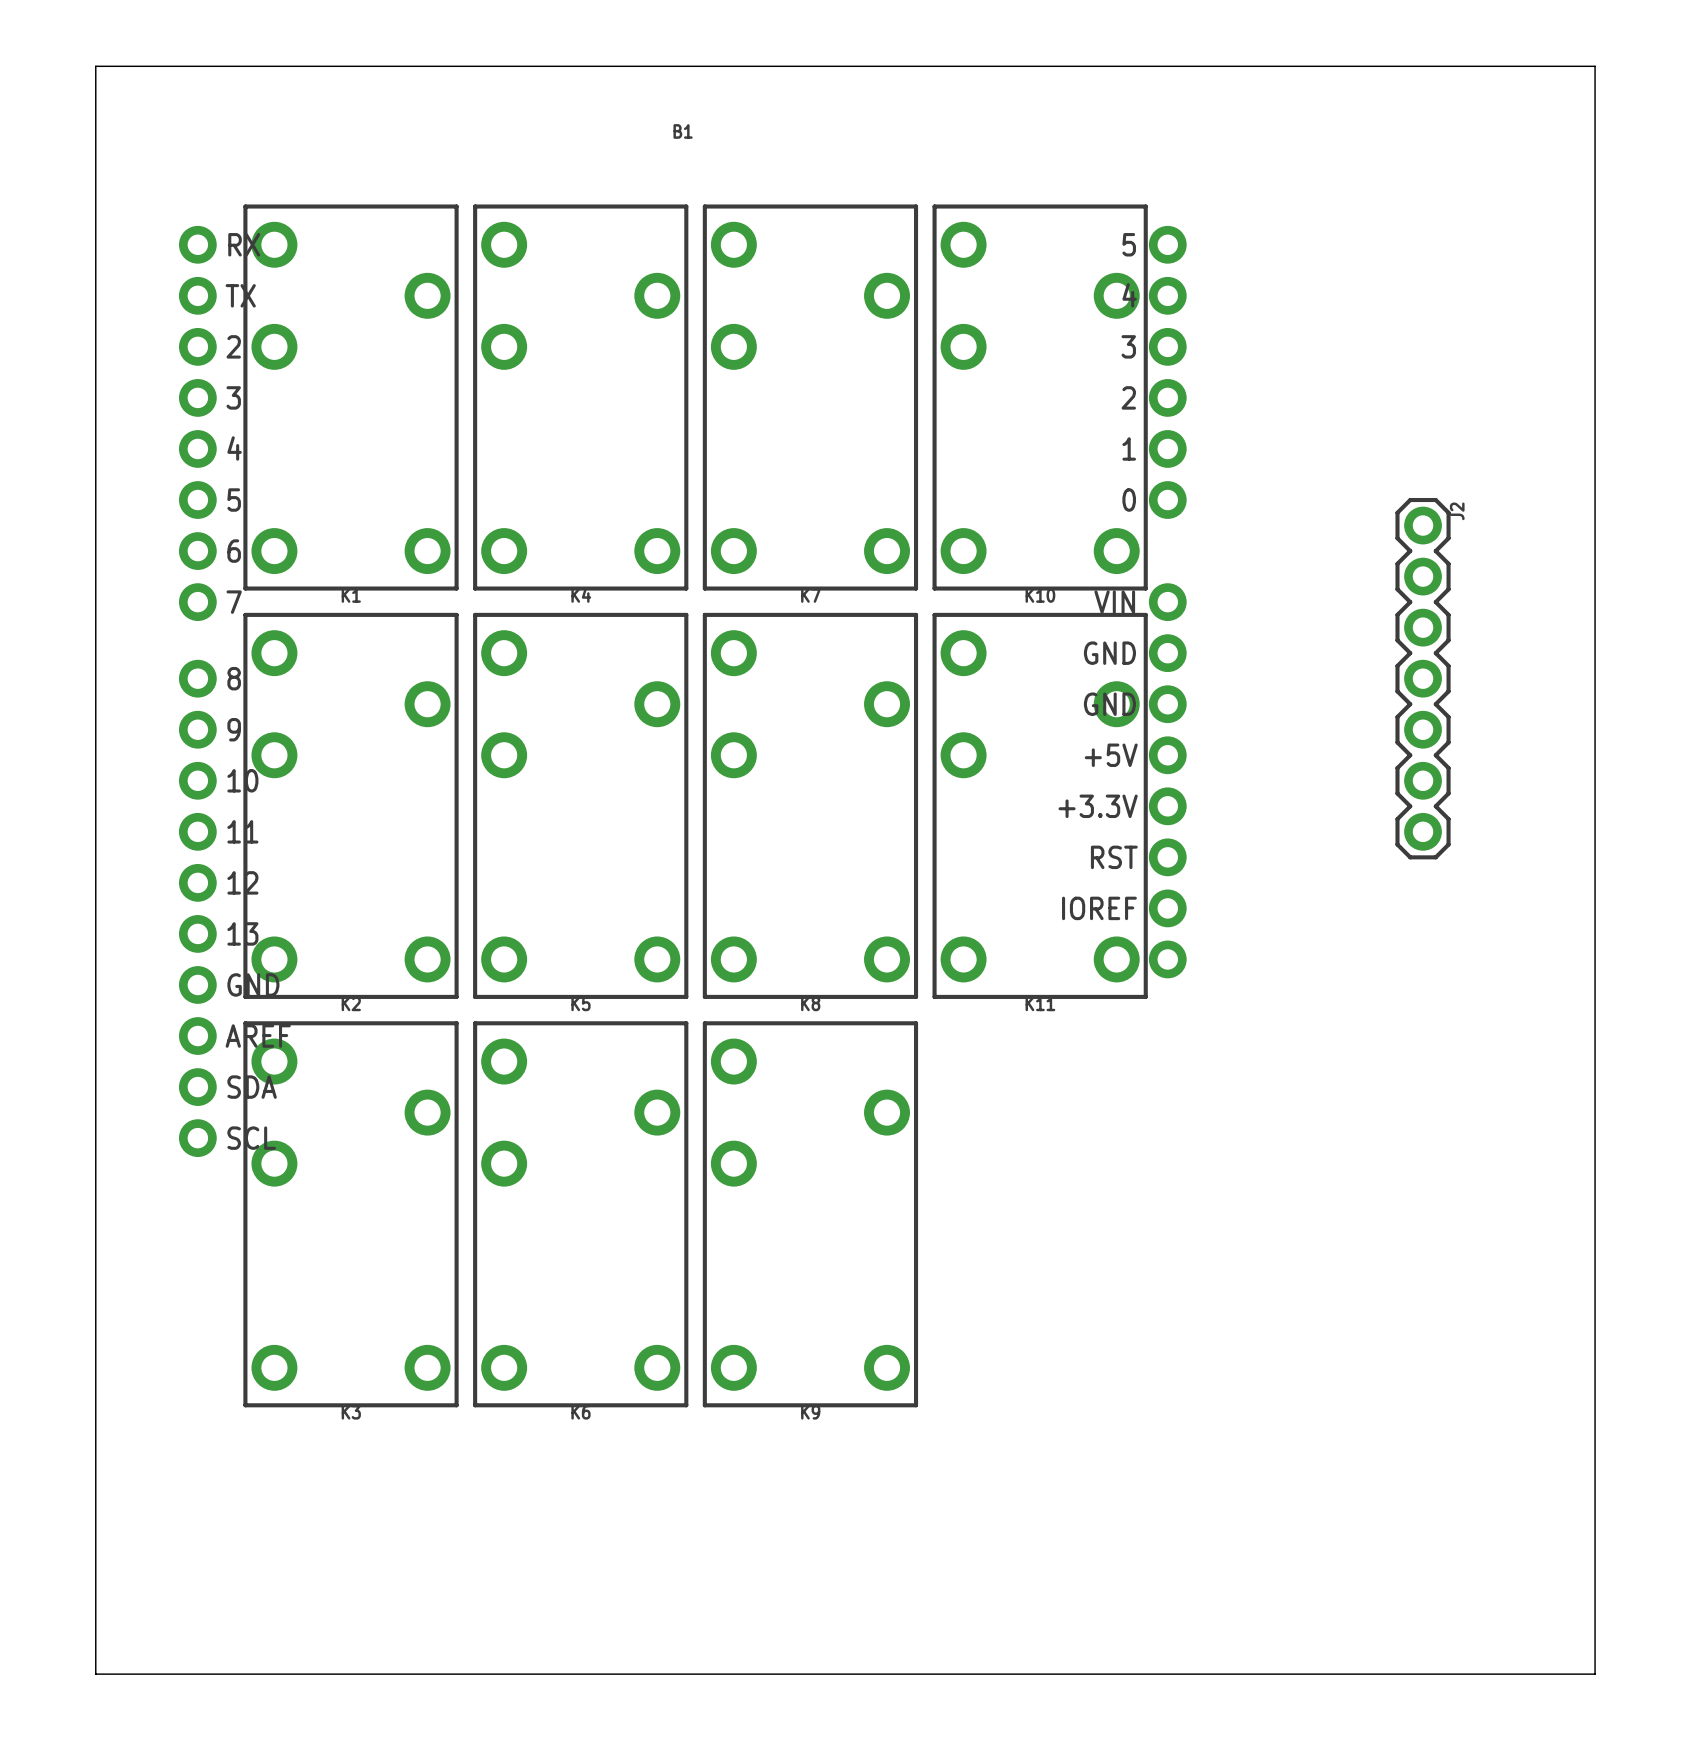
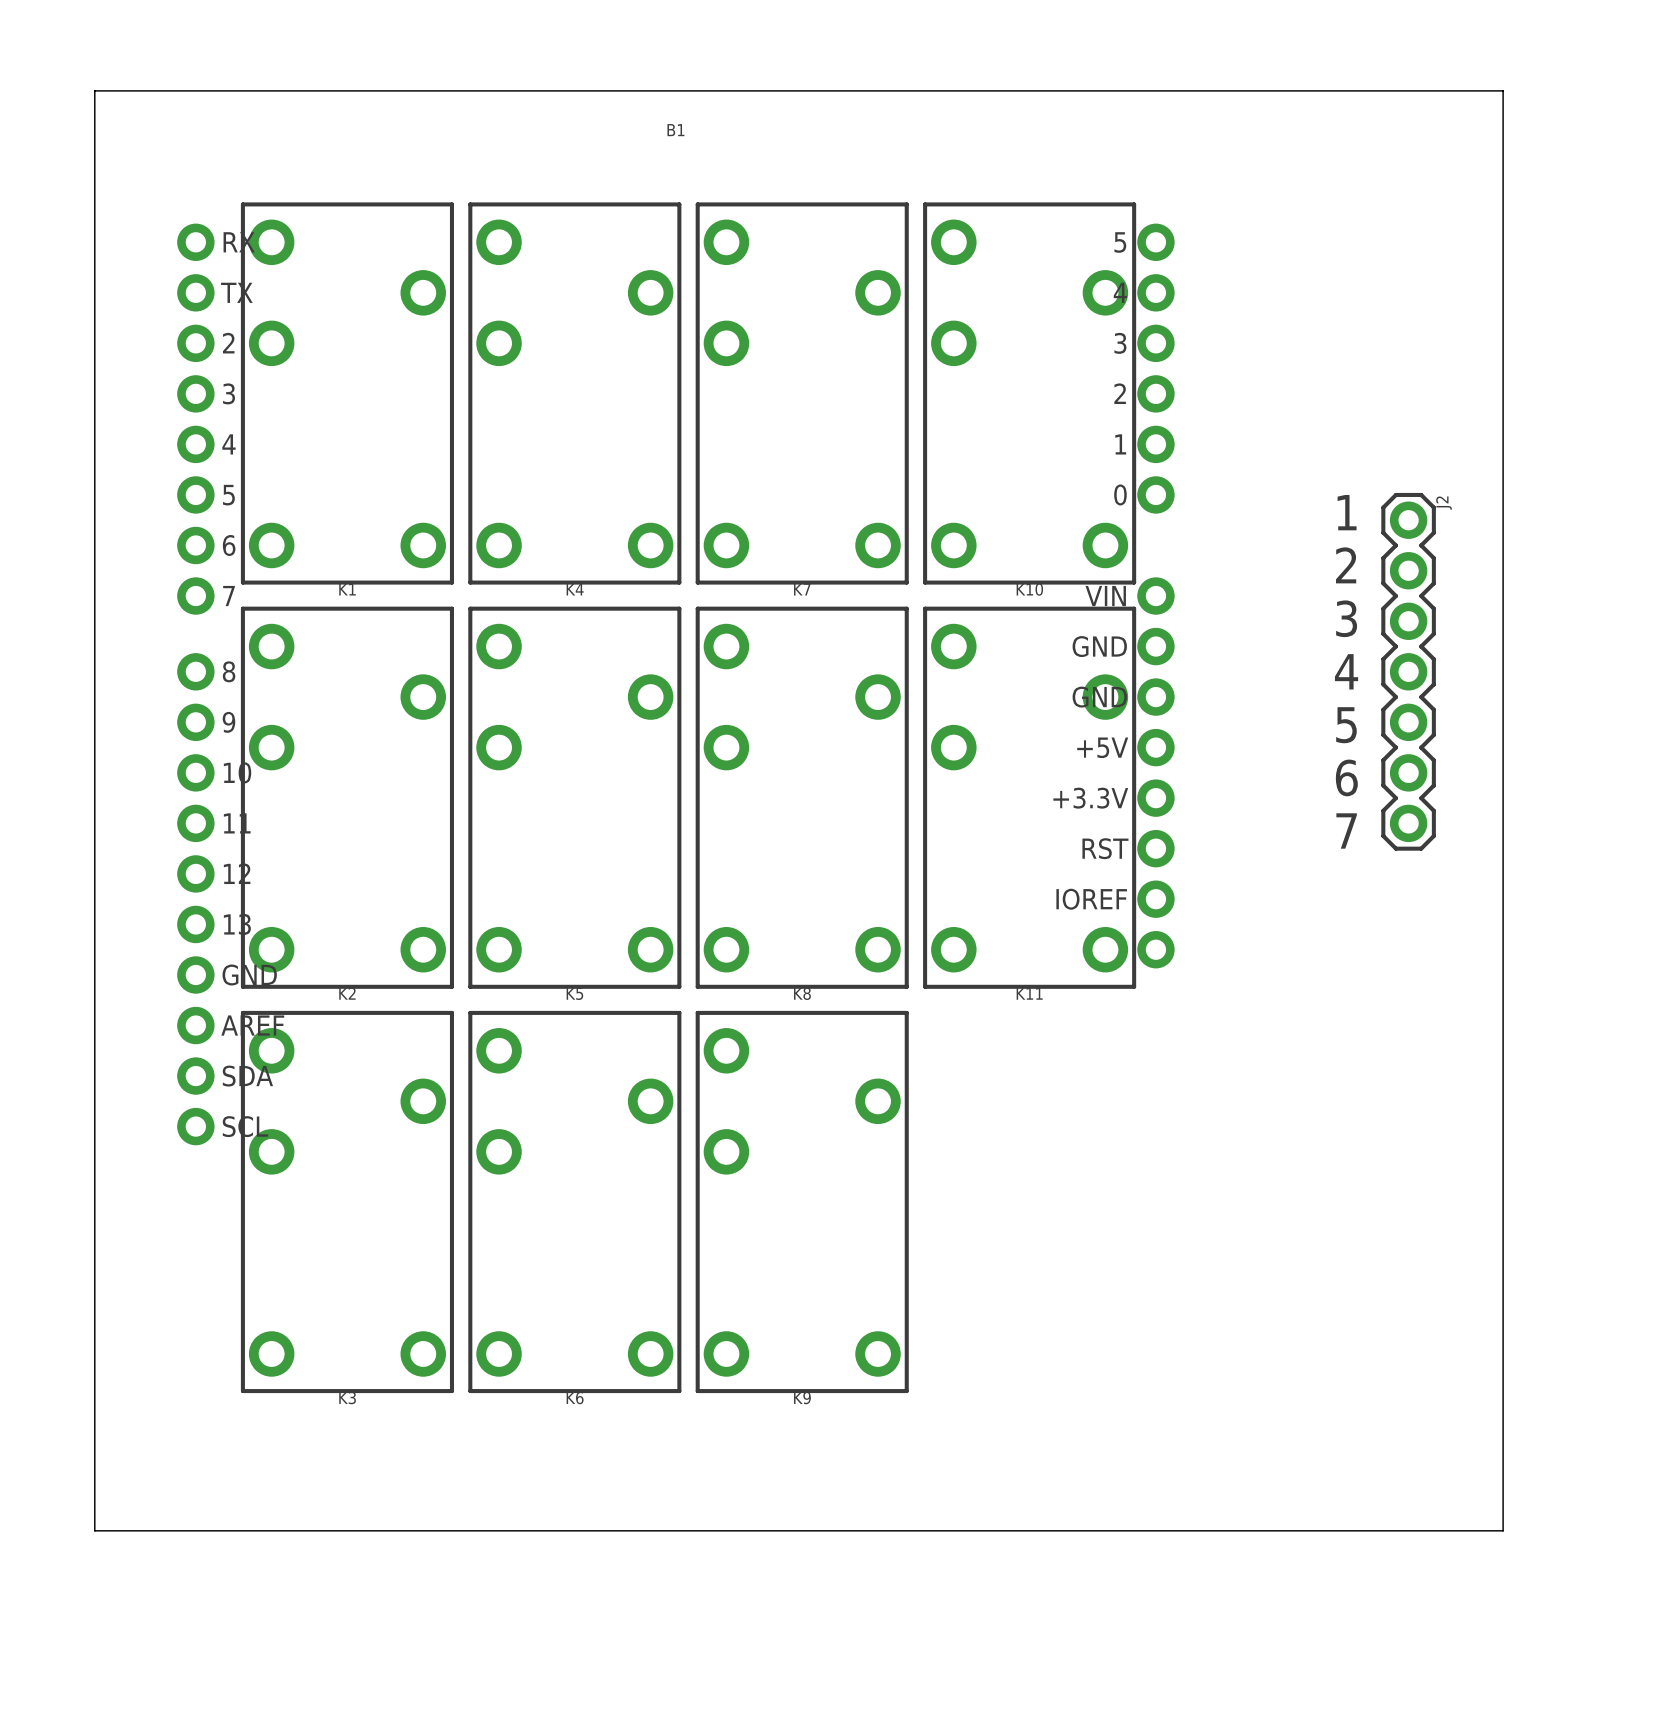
board edge: (95, 91) (95, 66) (1595, 66) (1595, 1674) (95, 1674) (95, 1546) -> (94, 90) (1503, 90) (1503, 1530) (94, 1530)
text: none -> 1 (1347, 512)
text: none -> 2 (1346, 565)
text: none -> 3 (1346, 618)
text: none -> 4 (1346, 671)
text: none -> 5 (1346, 725)
text: none -> 6 (1346, 777)
text: none -> 7 (1346, 830)

